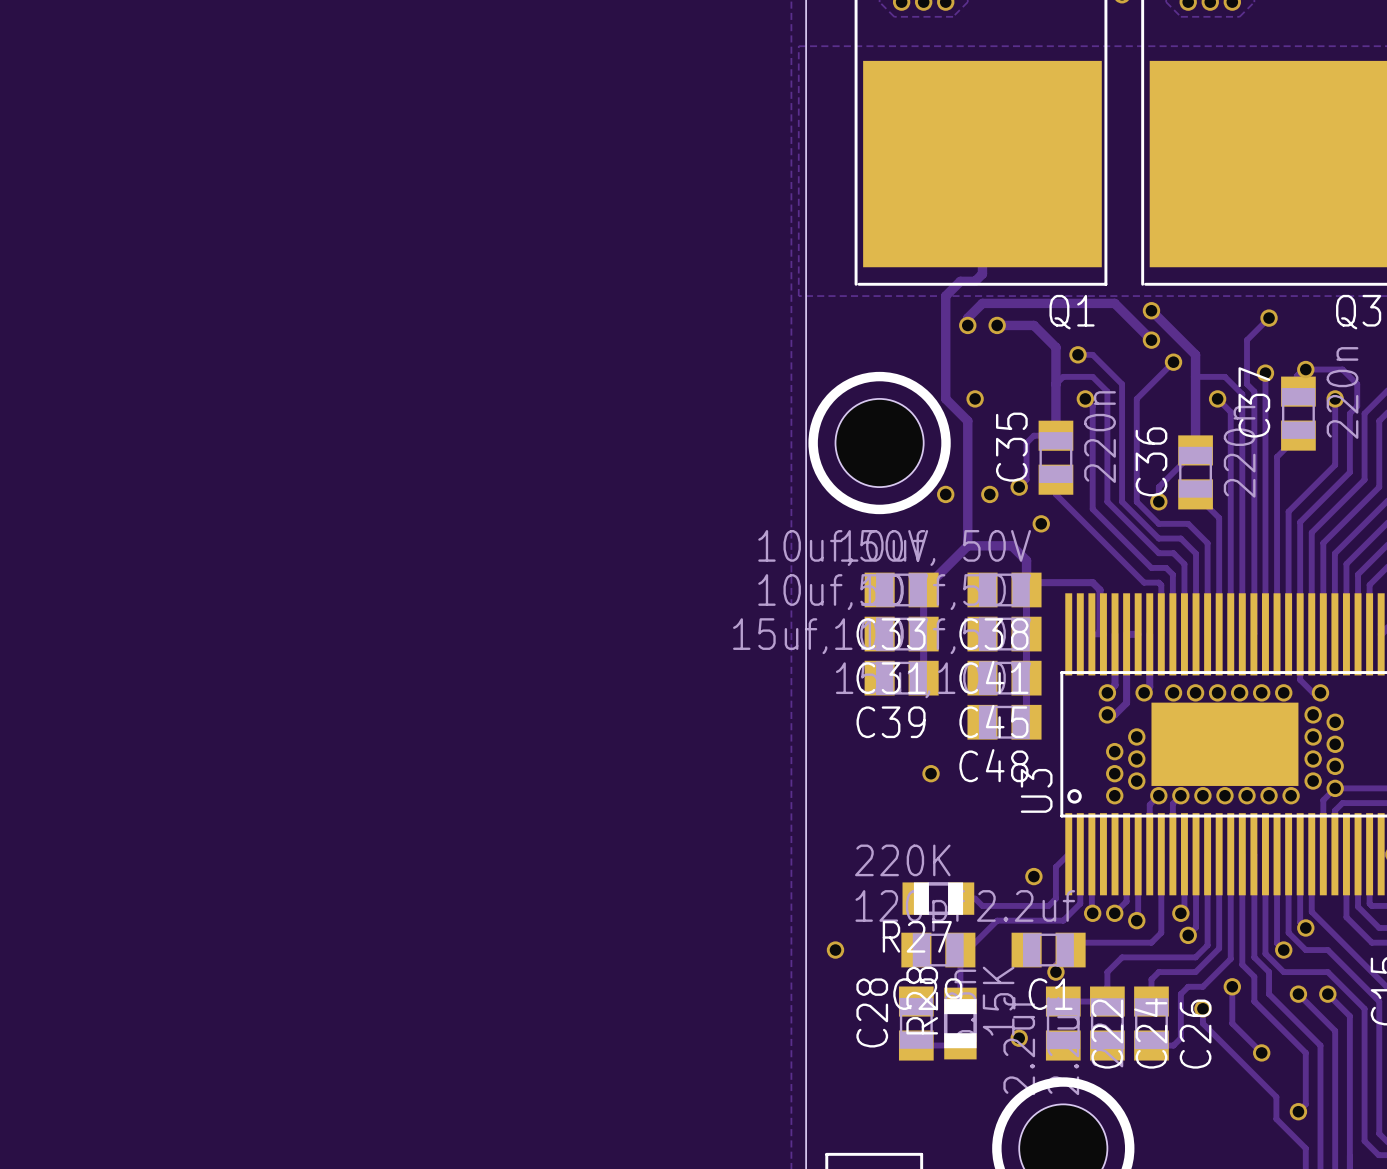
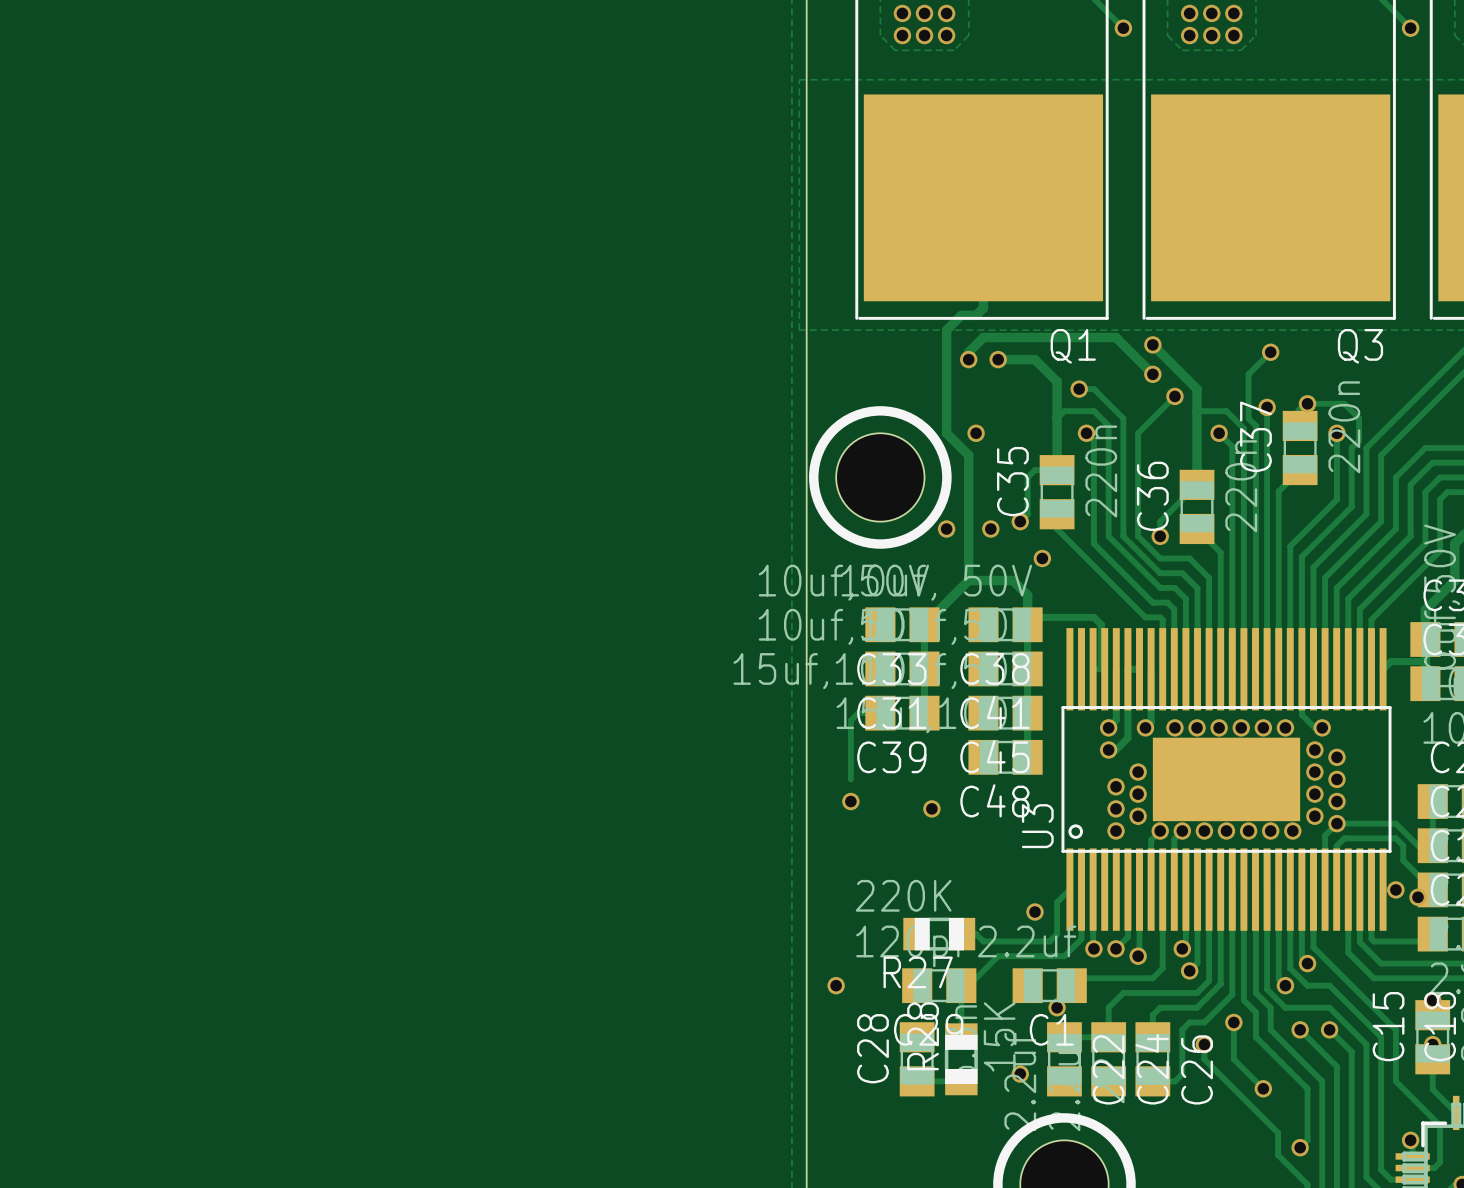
track: none -> (880, 713) (858, 713) (850, 720) (850, 779)
via: none -> (850, 801)

